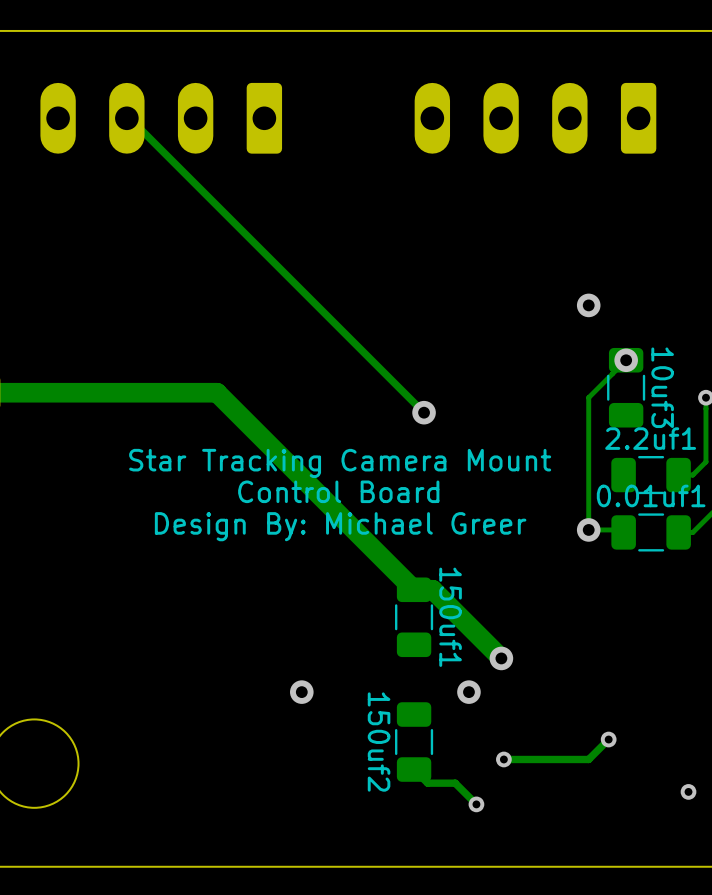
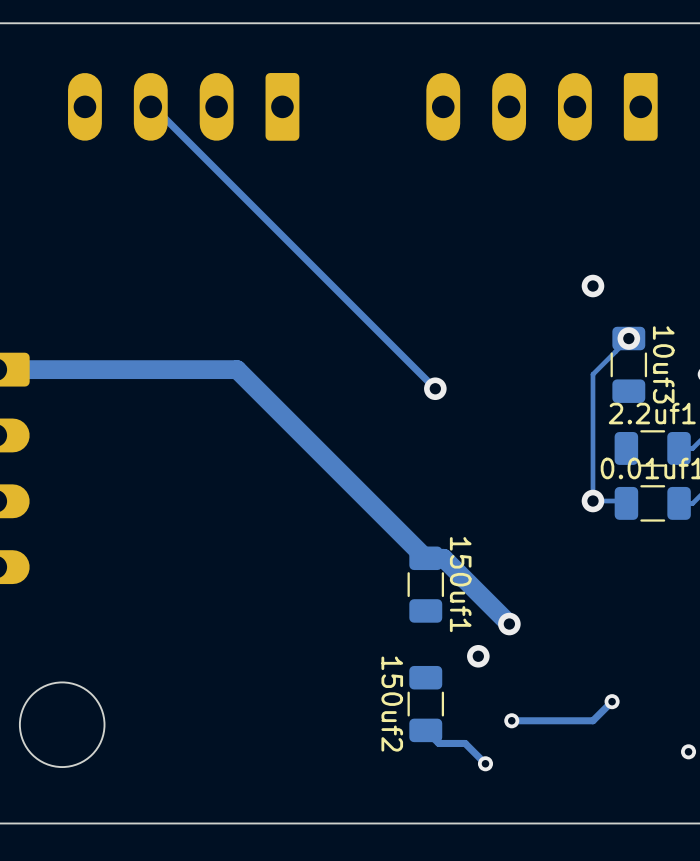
text: Star Tracking Camera Mount (340, 463) -> none
text: Control Board (338, 491) -> none
text: Design By: Michael Greer (340, 526) -> none
via: (301, 692) -> none

